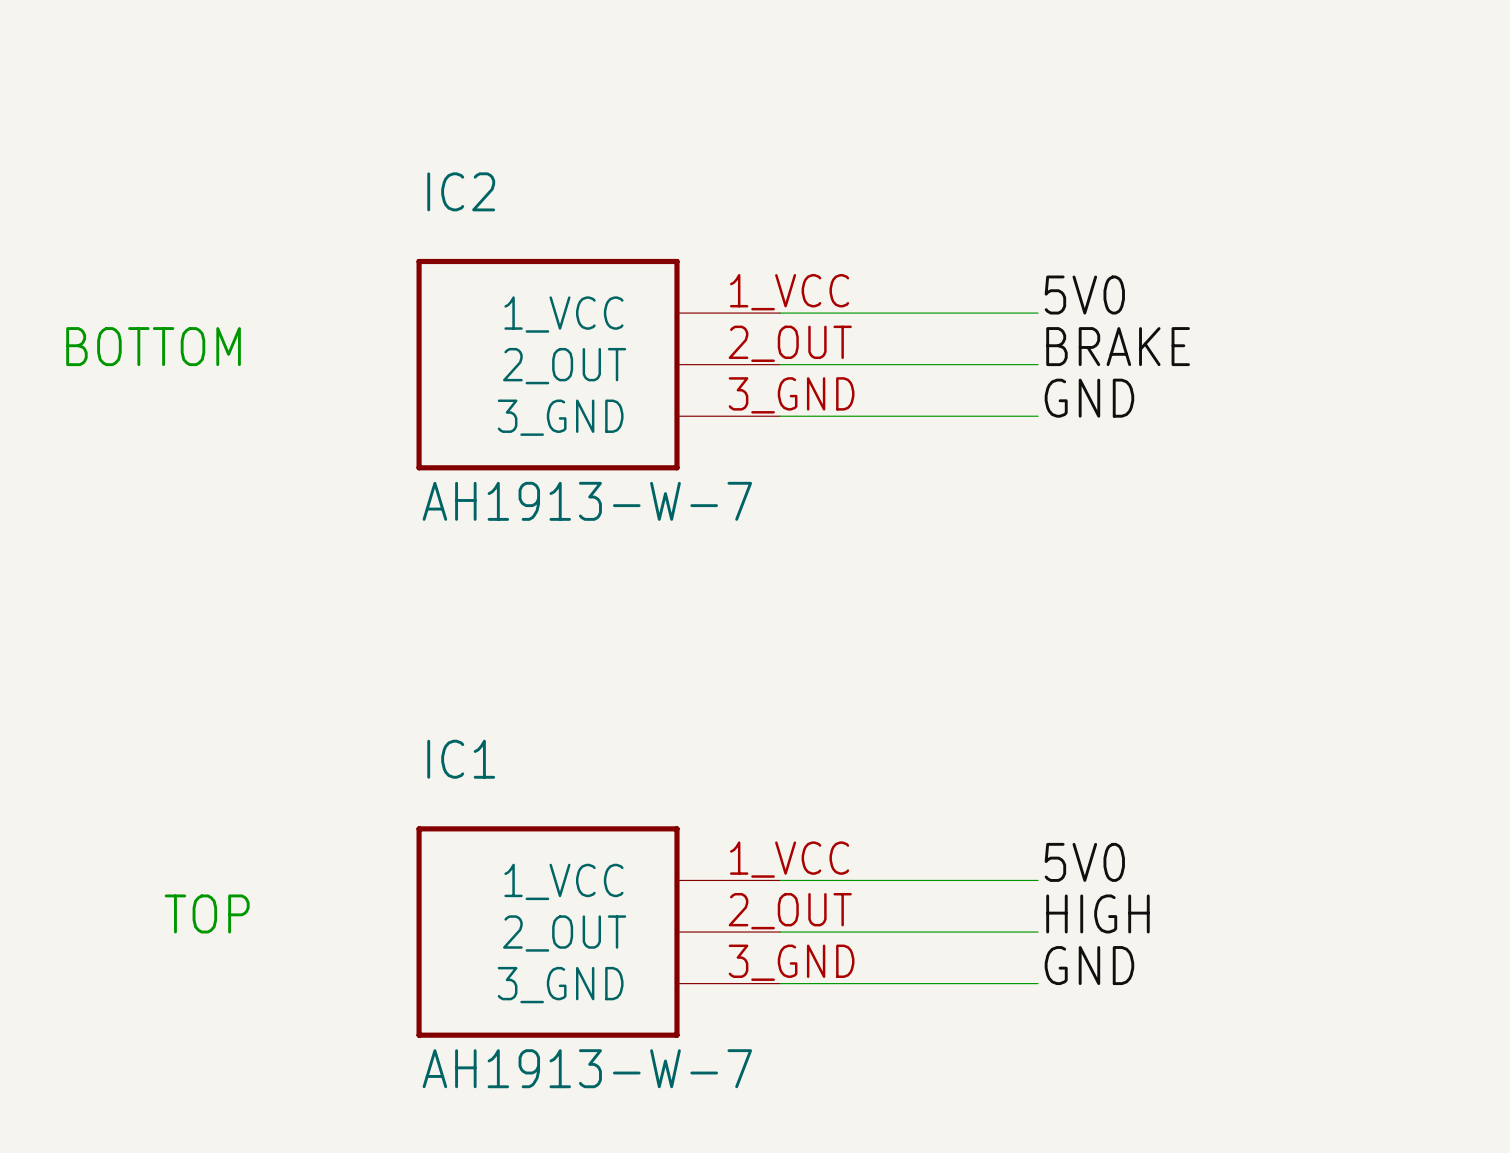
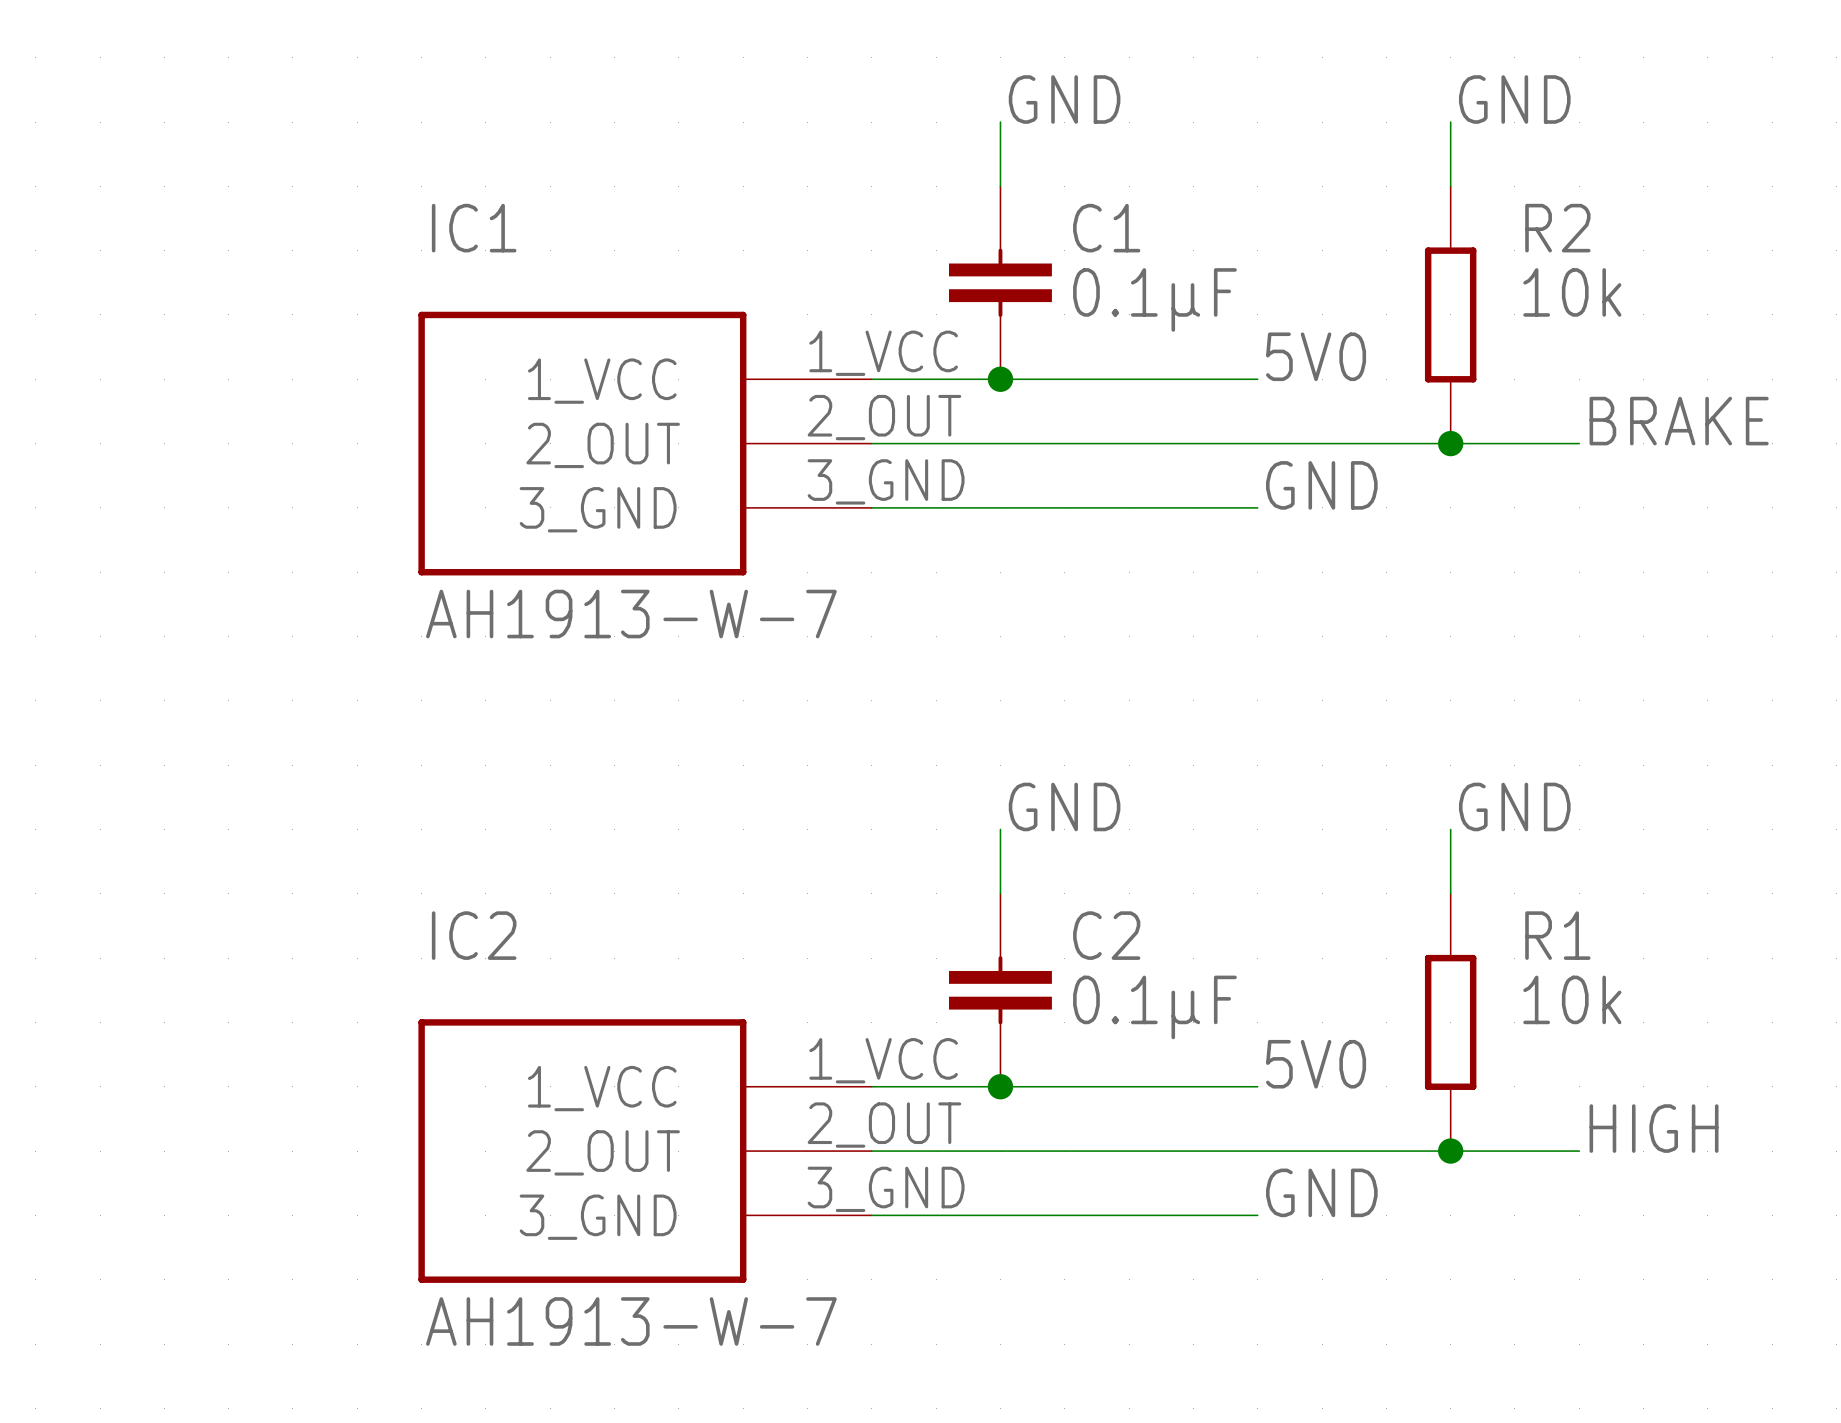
label: none -> GND (1064, 99)
label: none -> GND (1514, 99)
wire: none -> (1000, 122) (1000, 186)
wire: none -> (1450, 122) (1450, 186)
C1: none -> 0.1μF (1000, 282)
R2: none -> 10k (1450, 314)
junction: none -> (1000, 379)
text: BOTTOM (153, 346) -> none
label position: BRAKE (1118, 346) -> BRAKE (1679, 421)
IC2 position: (598, 364) -> (645, 1151)
wire: none -> (1257, 443) (1579, 443)
junction: none -> (1450, 443)
label: none -> GND (1064, 806)
label: none -> GND (1514, 806)
wire: none -> (1000, 829) (1000, 893)
wire: none -> (1450, 829) (1450, 893)
C2: none -> 0.1μF (1000, 990)
R1: none -> 10k (1450, 1022)
junction: none -> (1000, 1086)
text: TOP (207, 913) -> none
label position: HIGH (1097, 913) -> HIGH (1654, 1128)
IC1 position: (598, 932) -> (645, 443)
wire: none -> (1257, 1151) (1579, 1151)
junction: none -> (1450, 1151)

